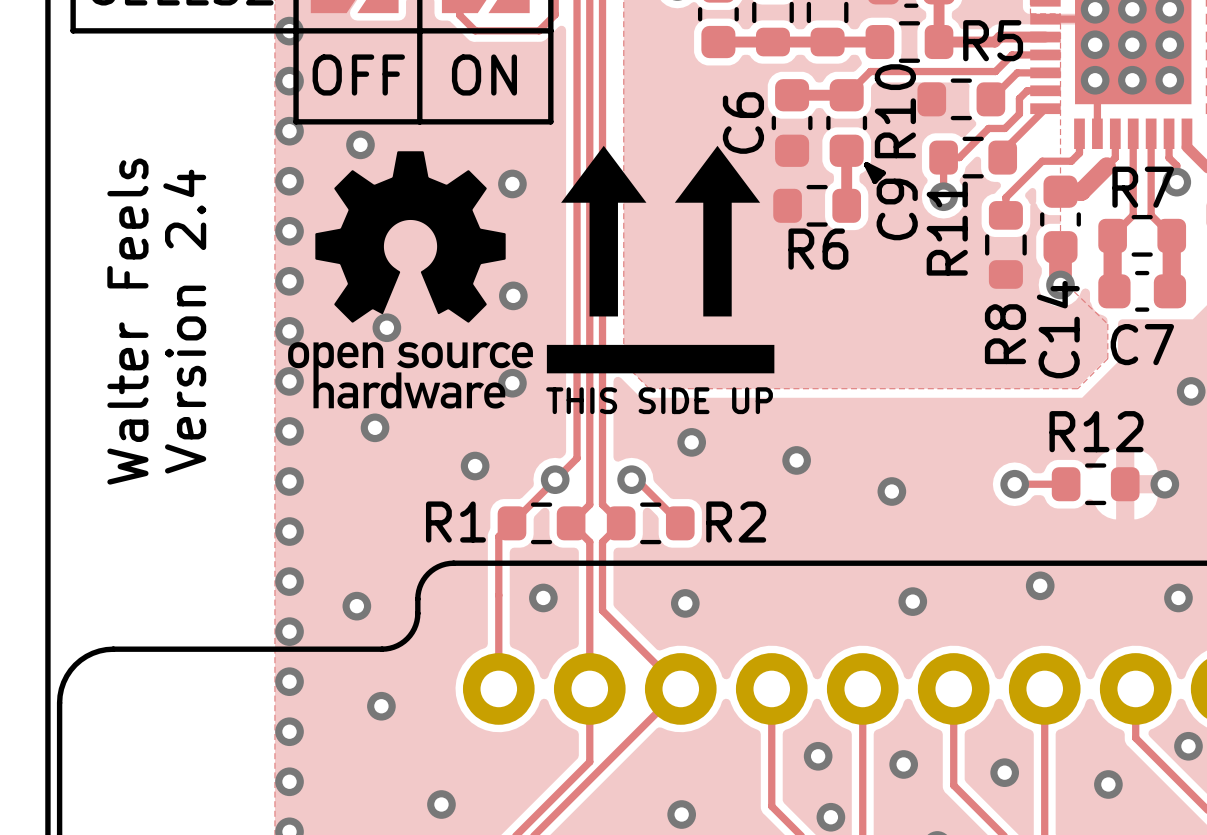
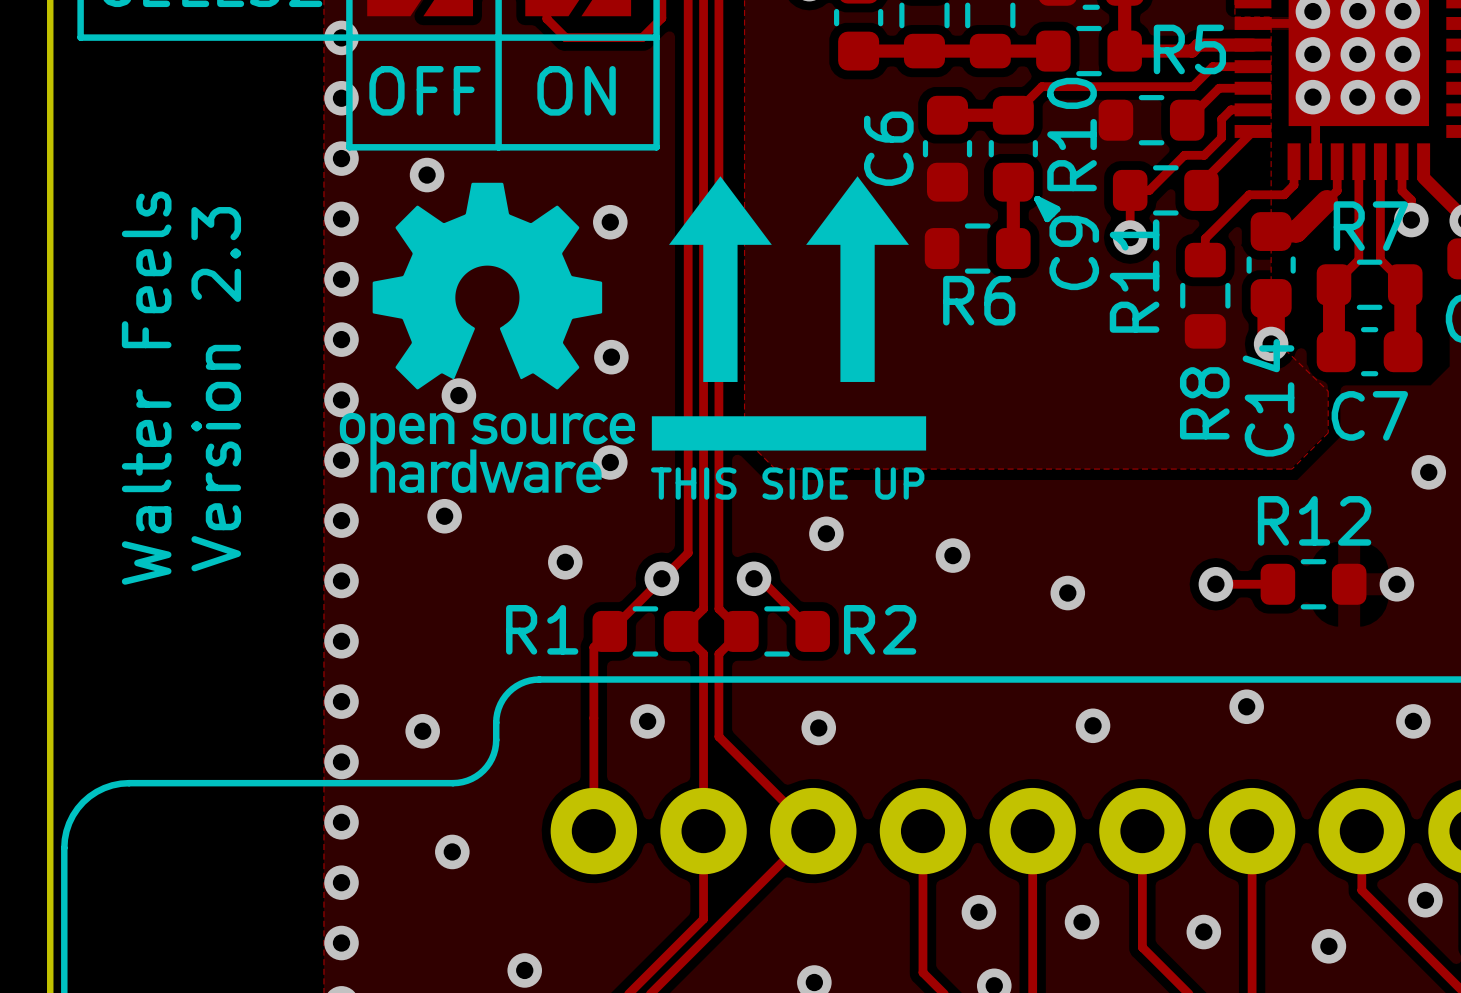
text: Version 2.4 (184, 321) -> Version 2.3 (216, 389)

